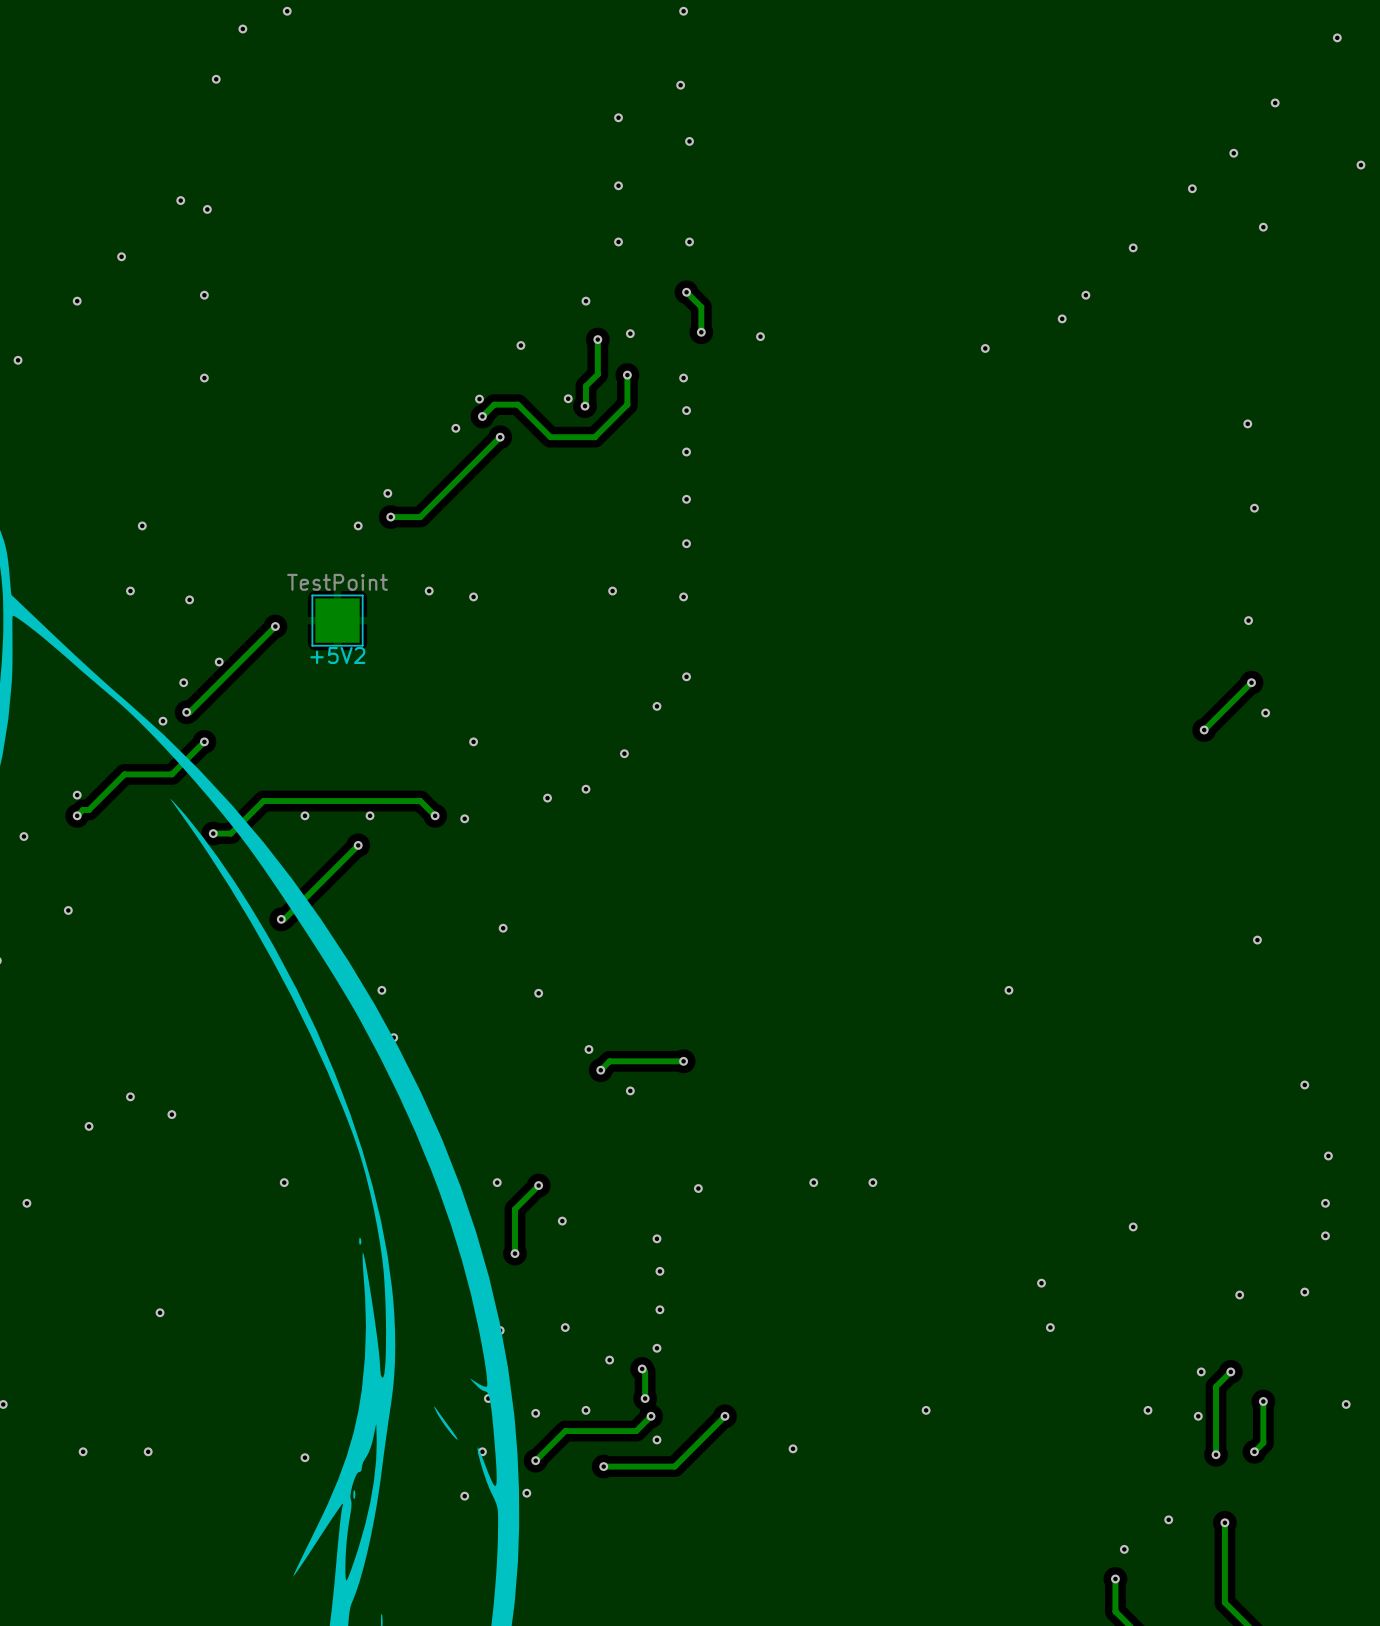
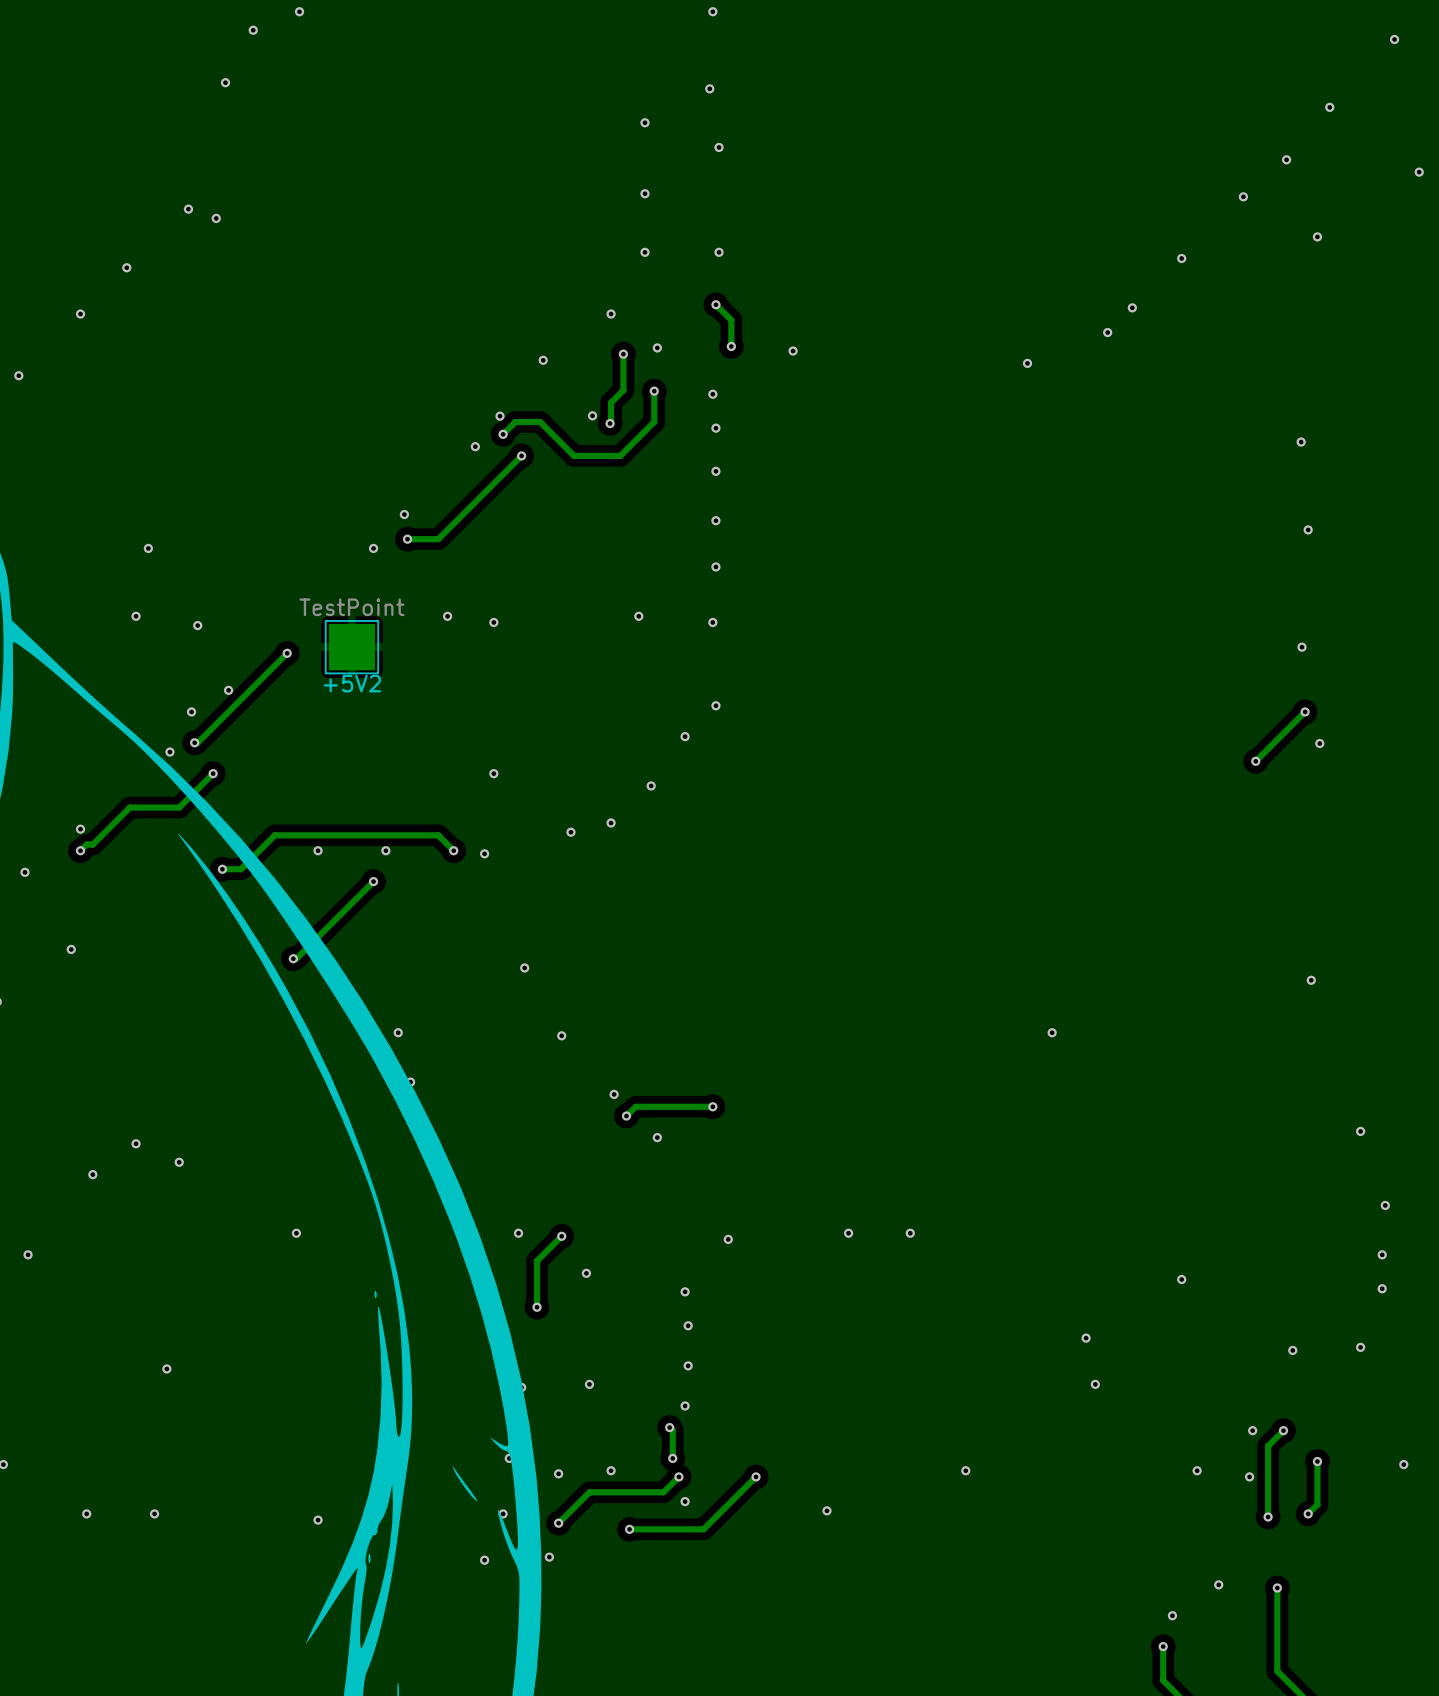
via: (204, 295) -> none
via: (204, 378) -> none
via: (609, 1360) -> none

